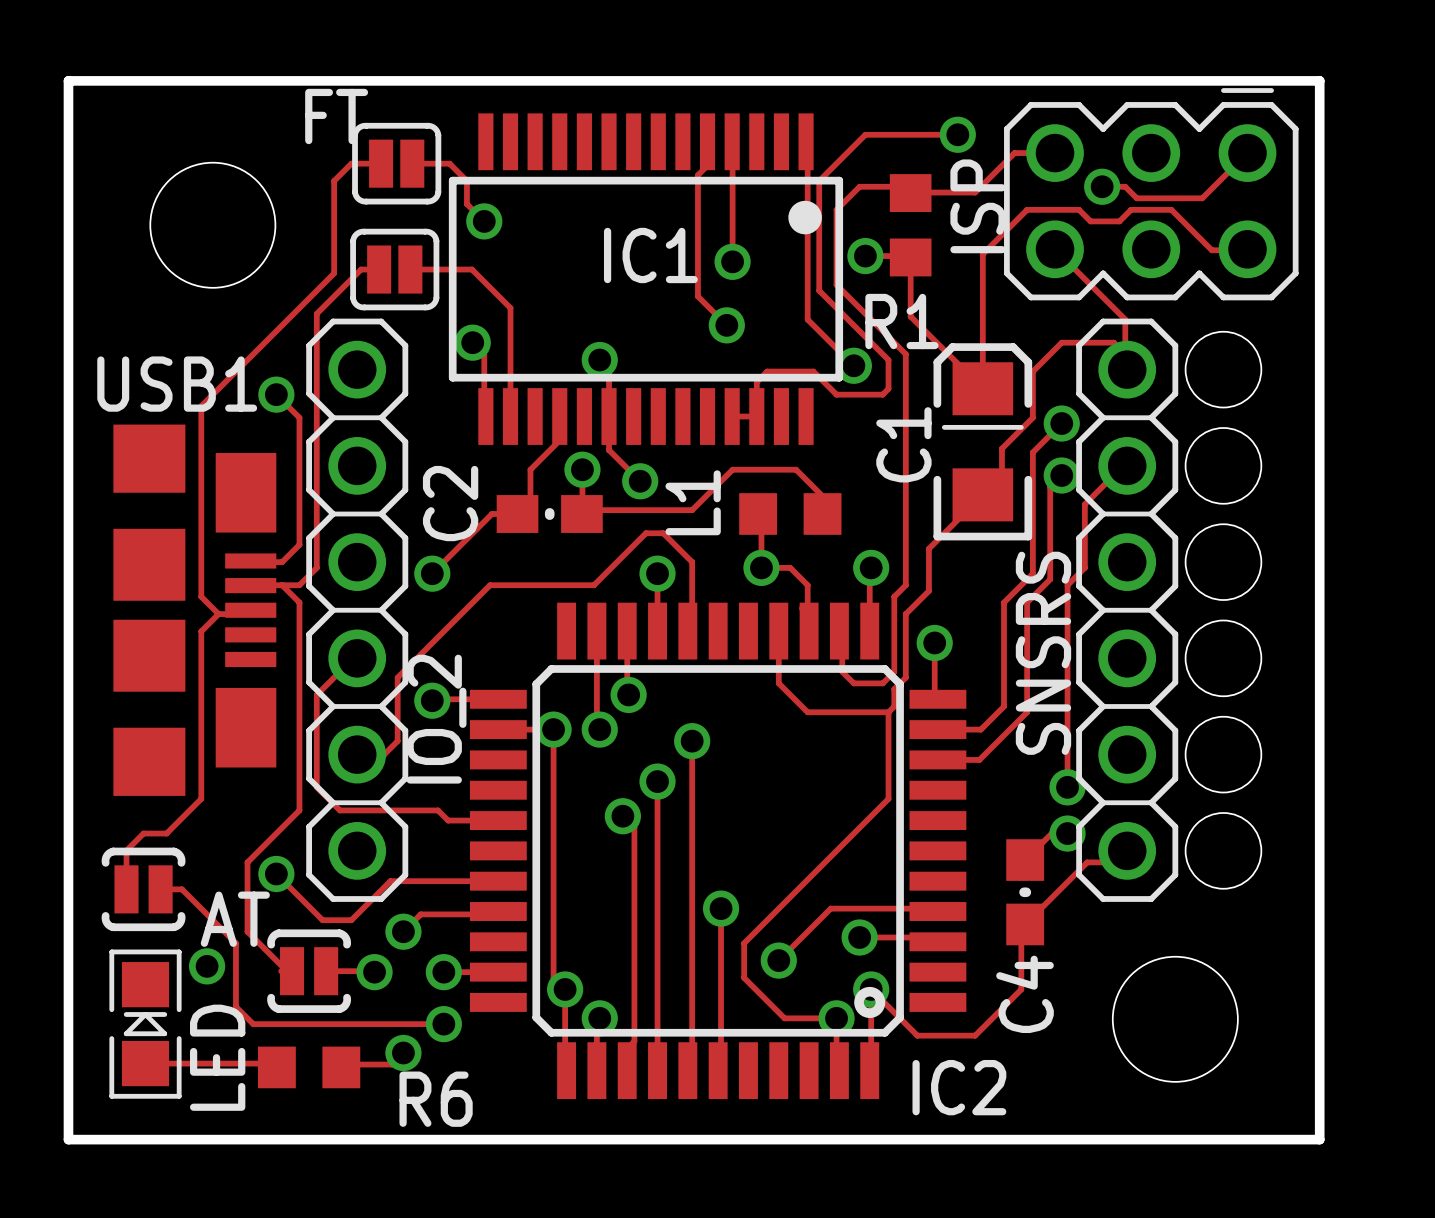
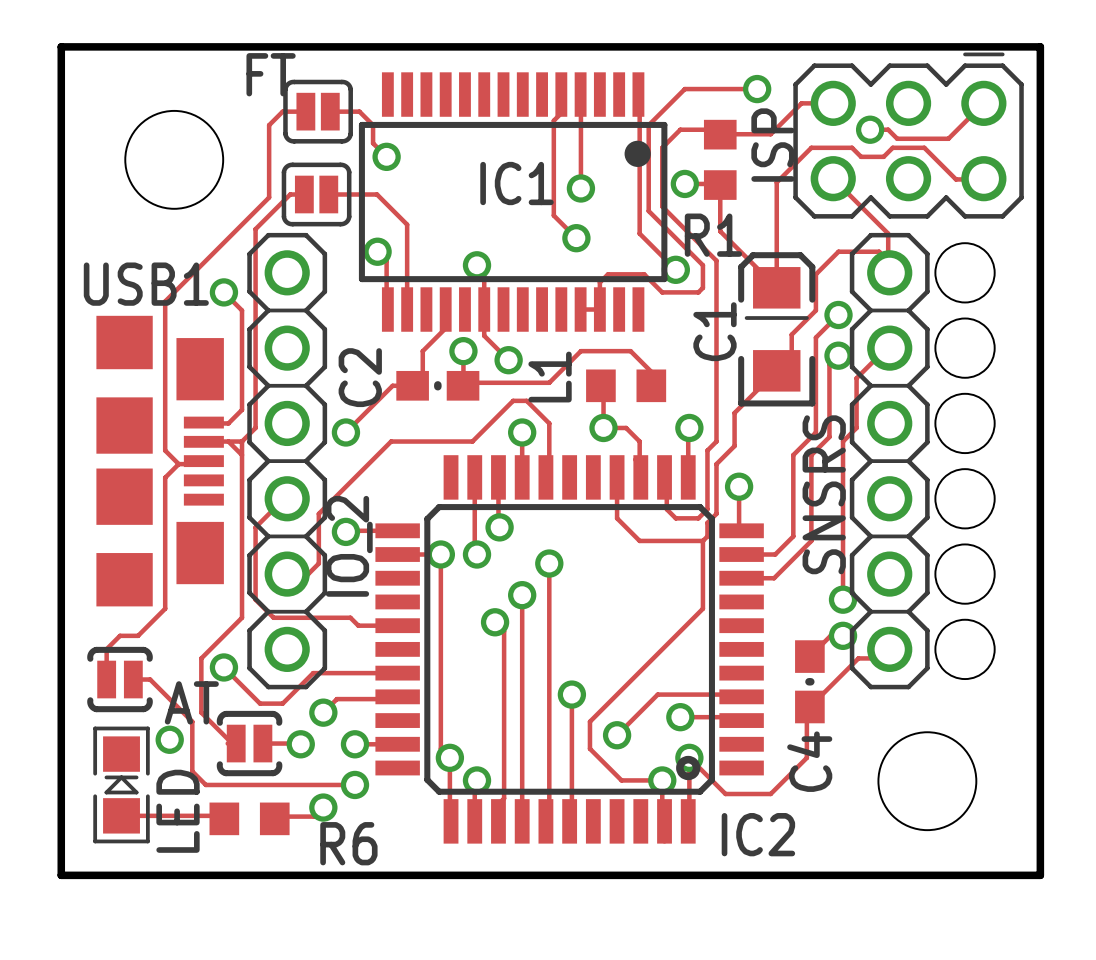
track: none -> (242, 441) (242, 455)

